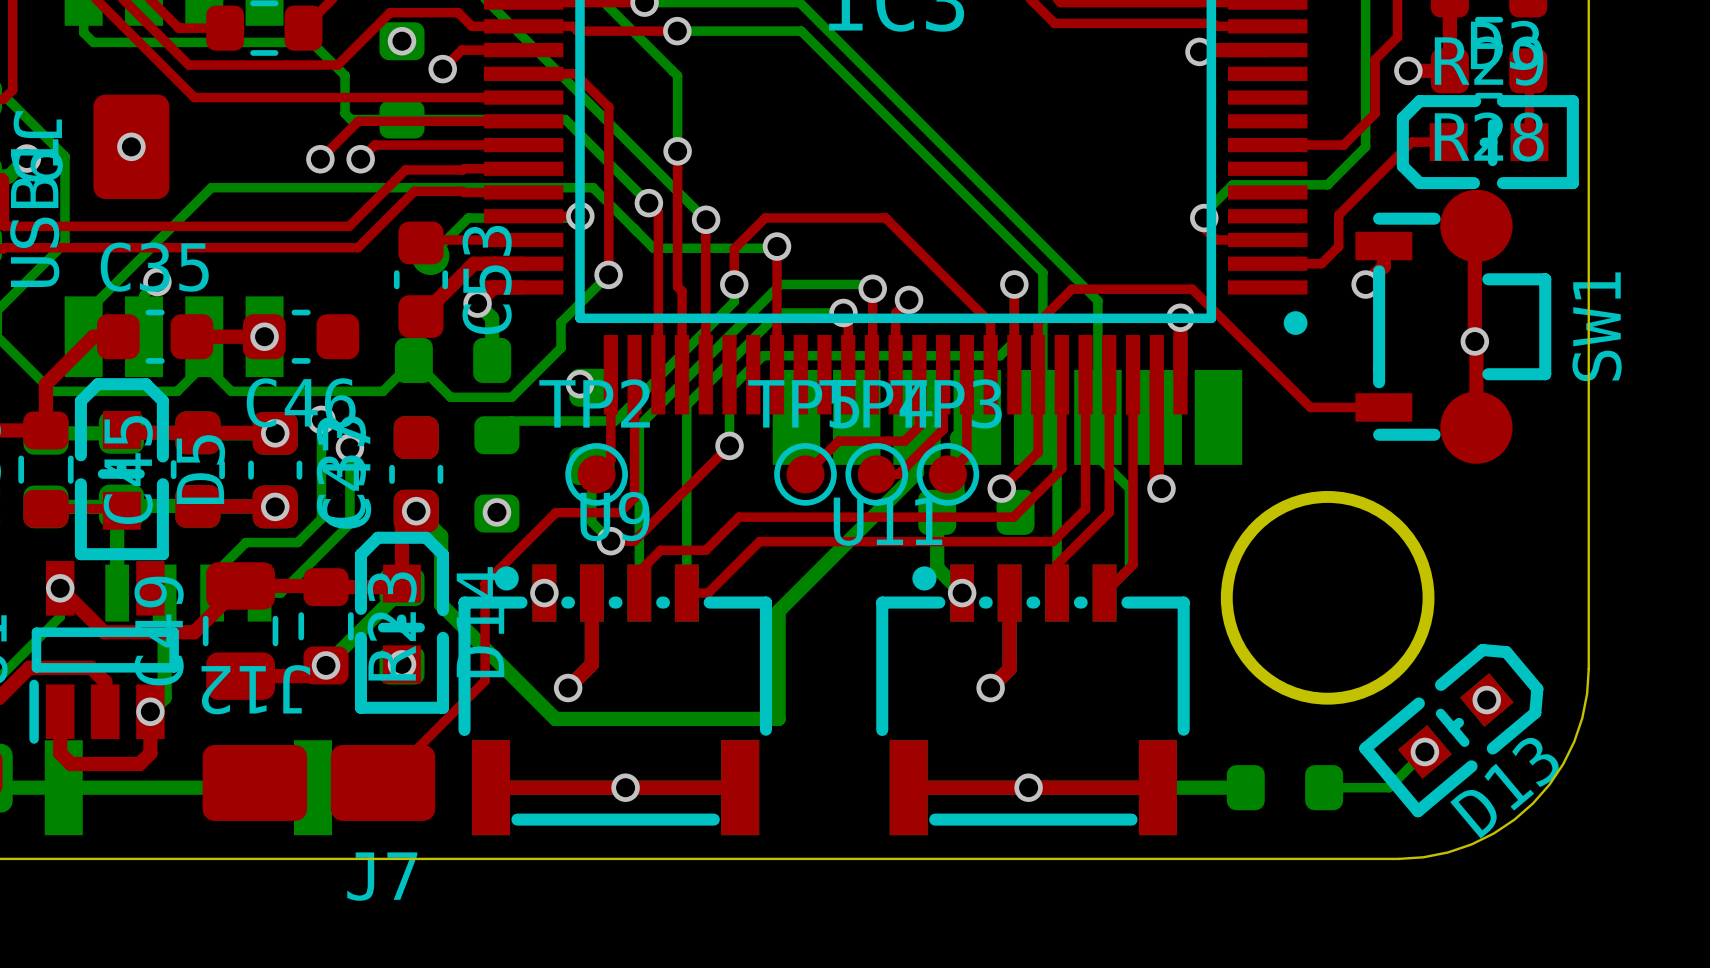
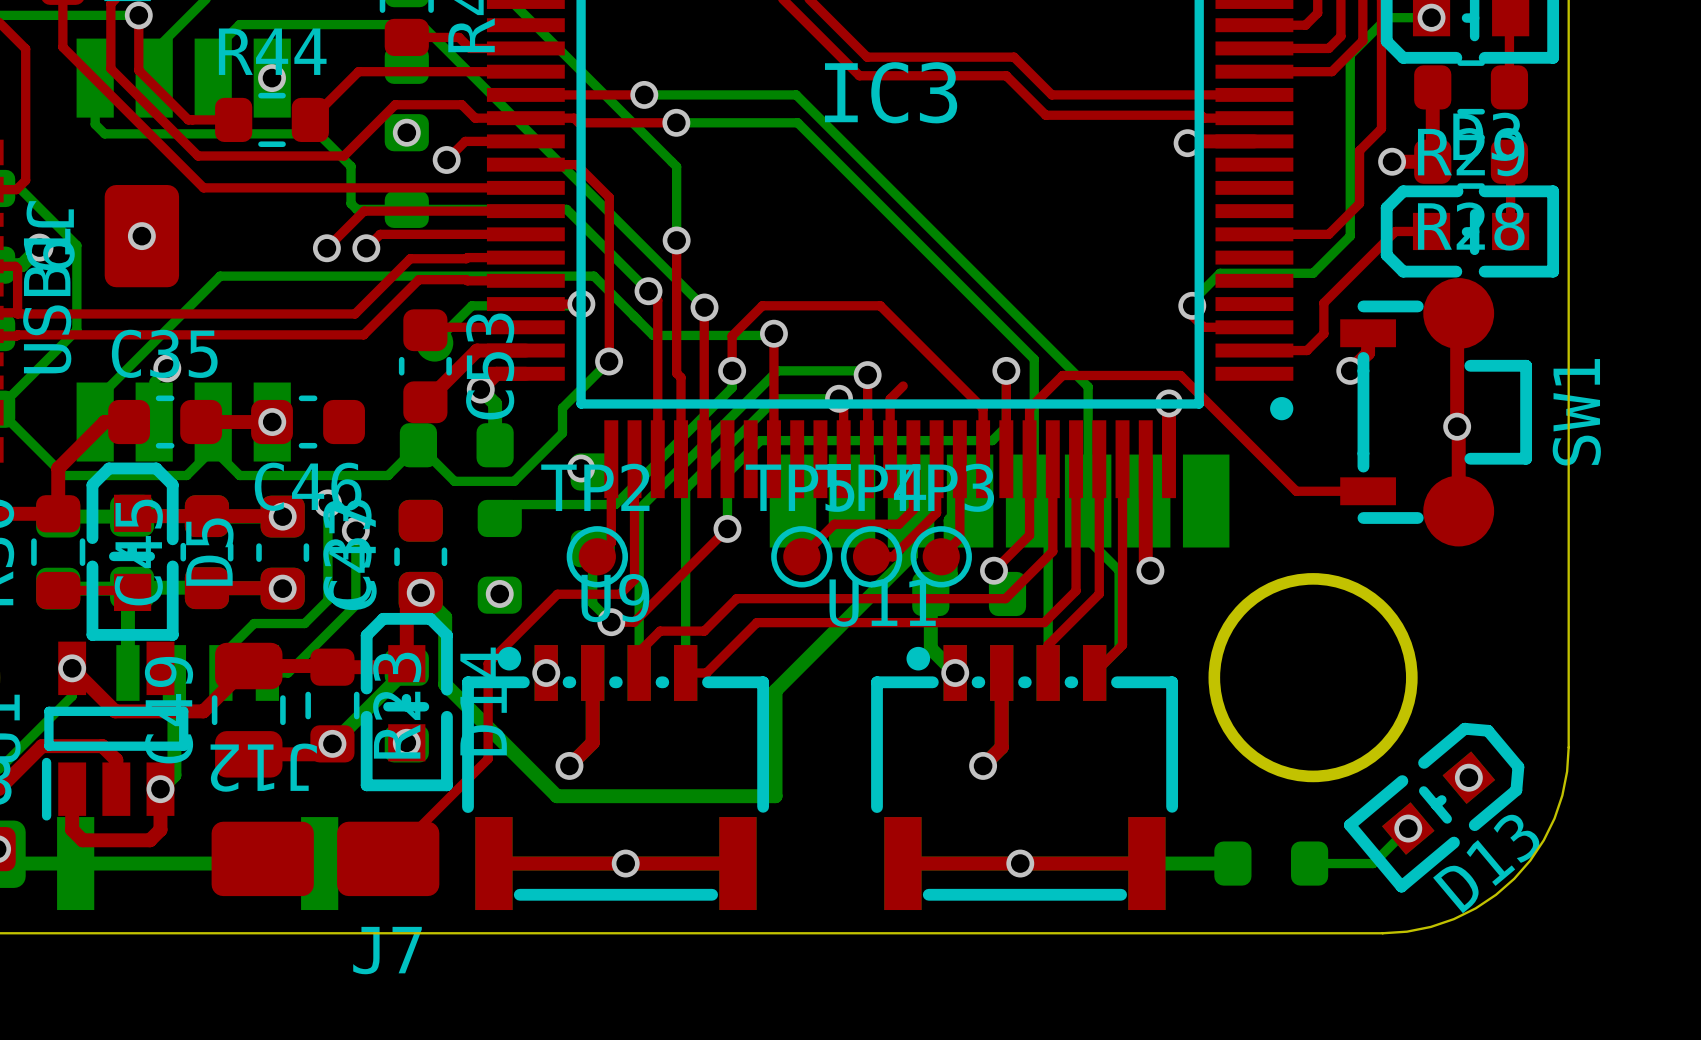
via: (909, 299) -> none

